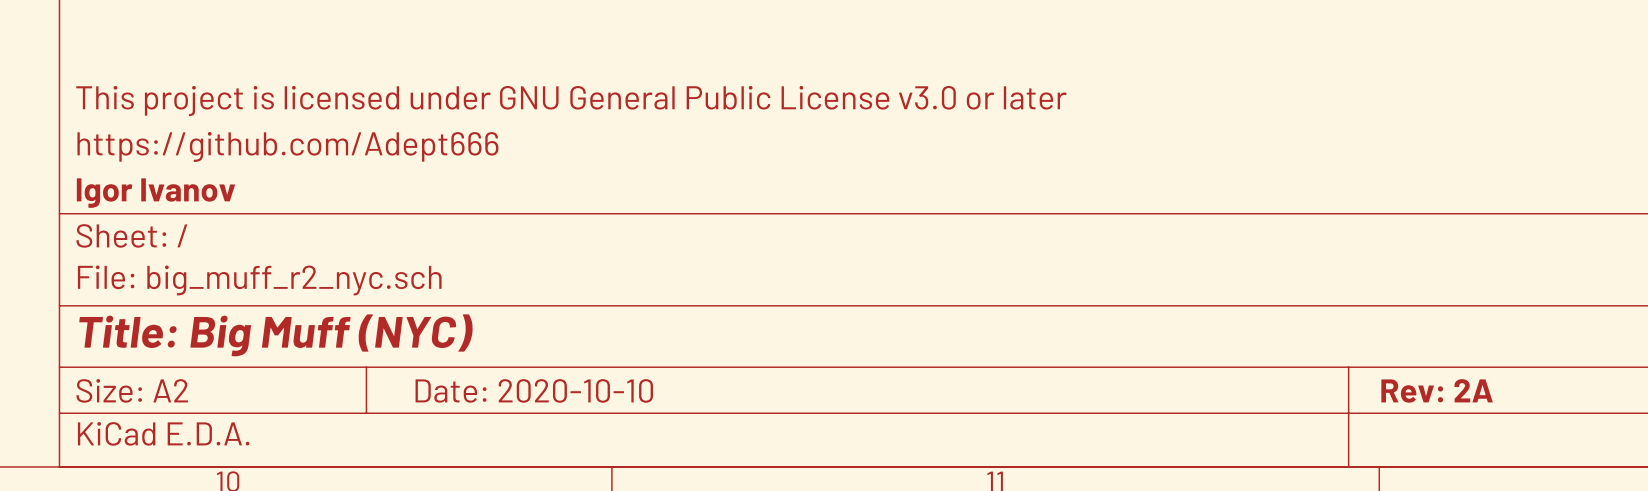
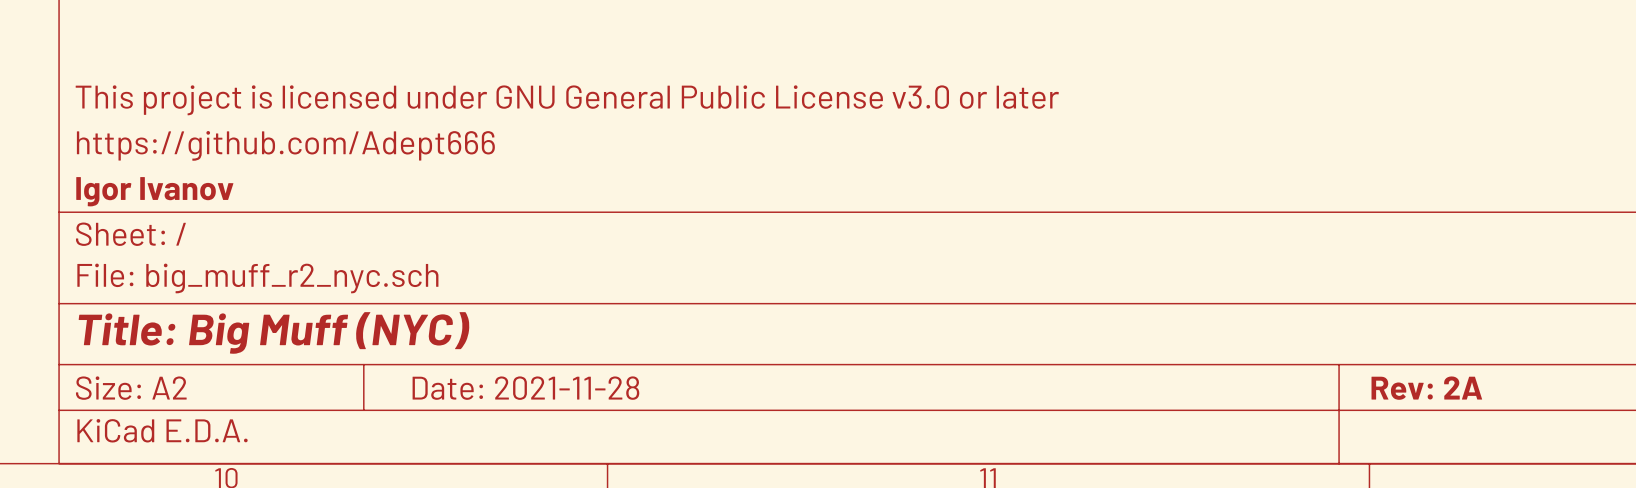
title block: Date: 2020-10-10 (534, 390) -> Date: 2021-11-28 (525, 388)

